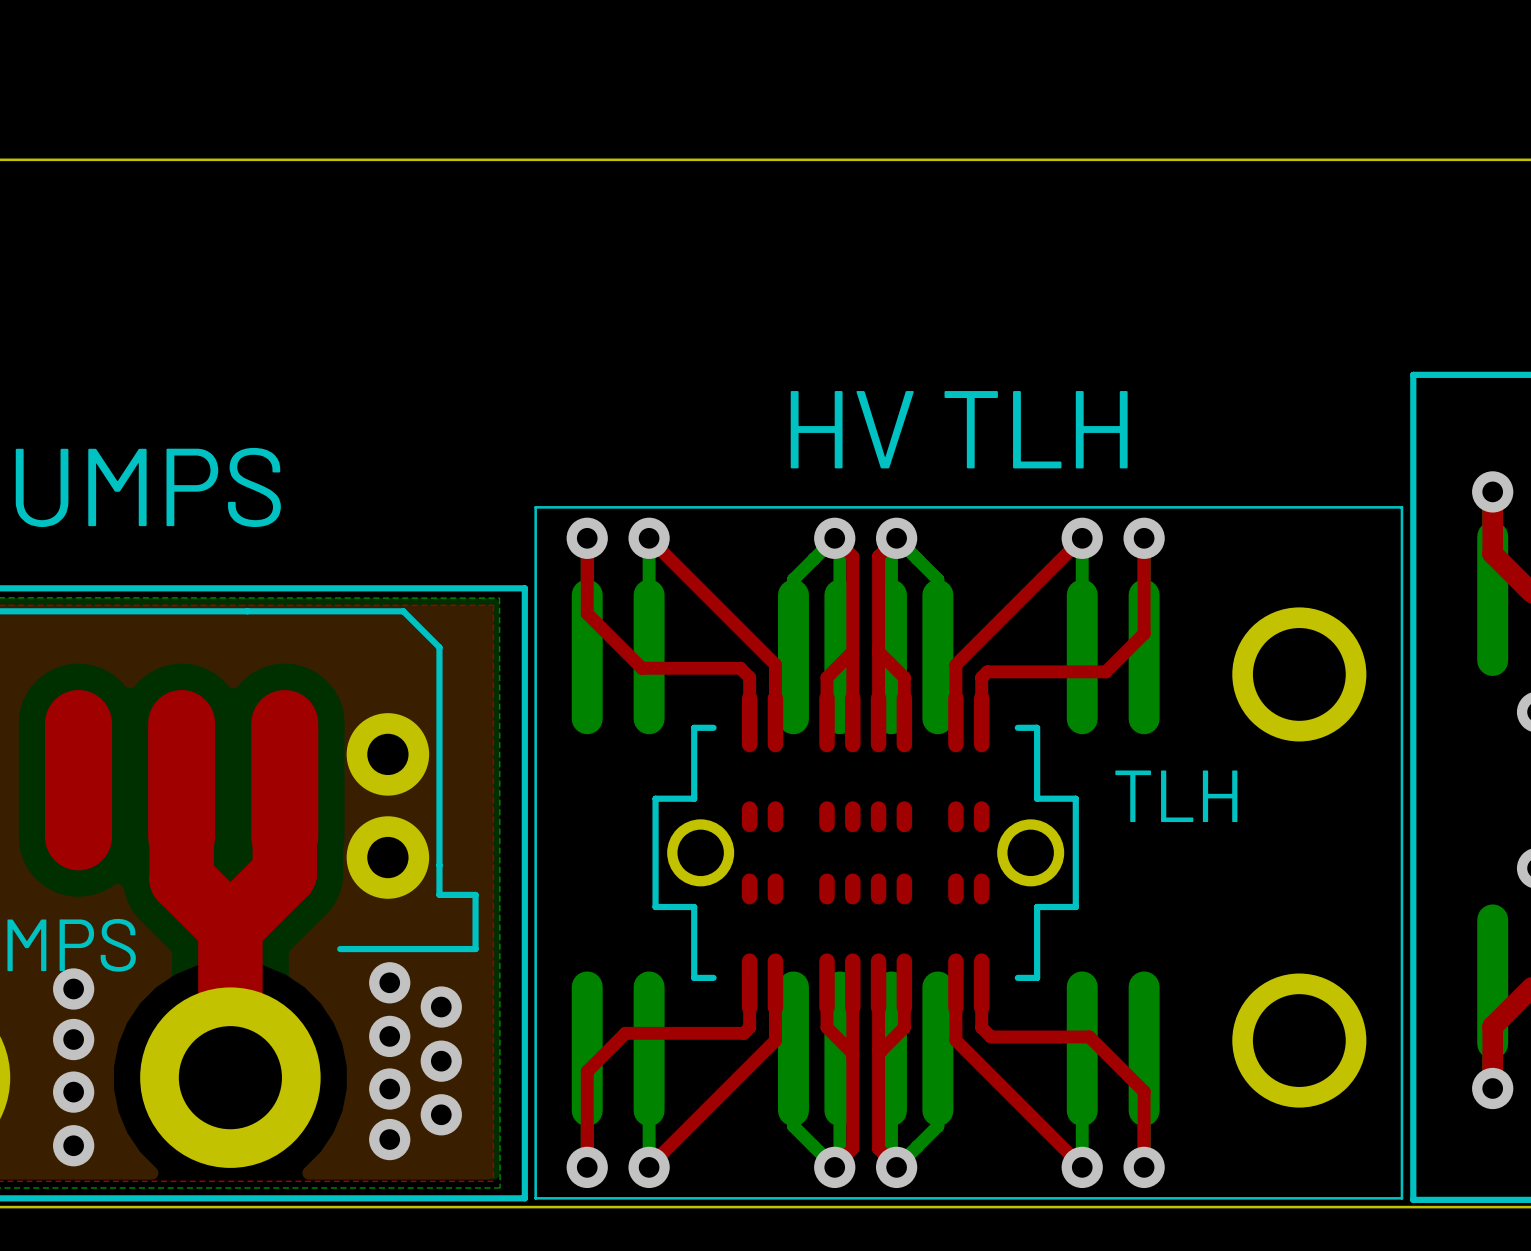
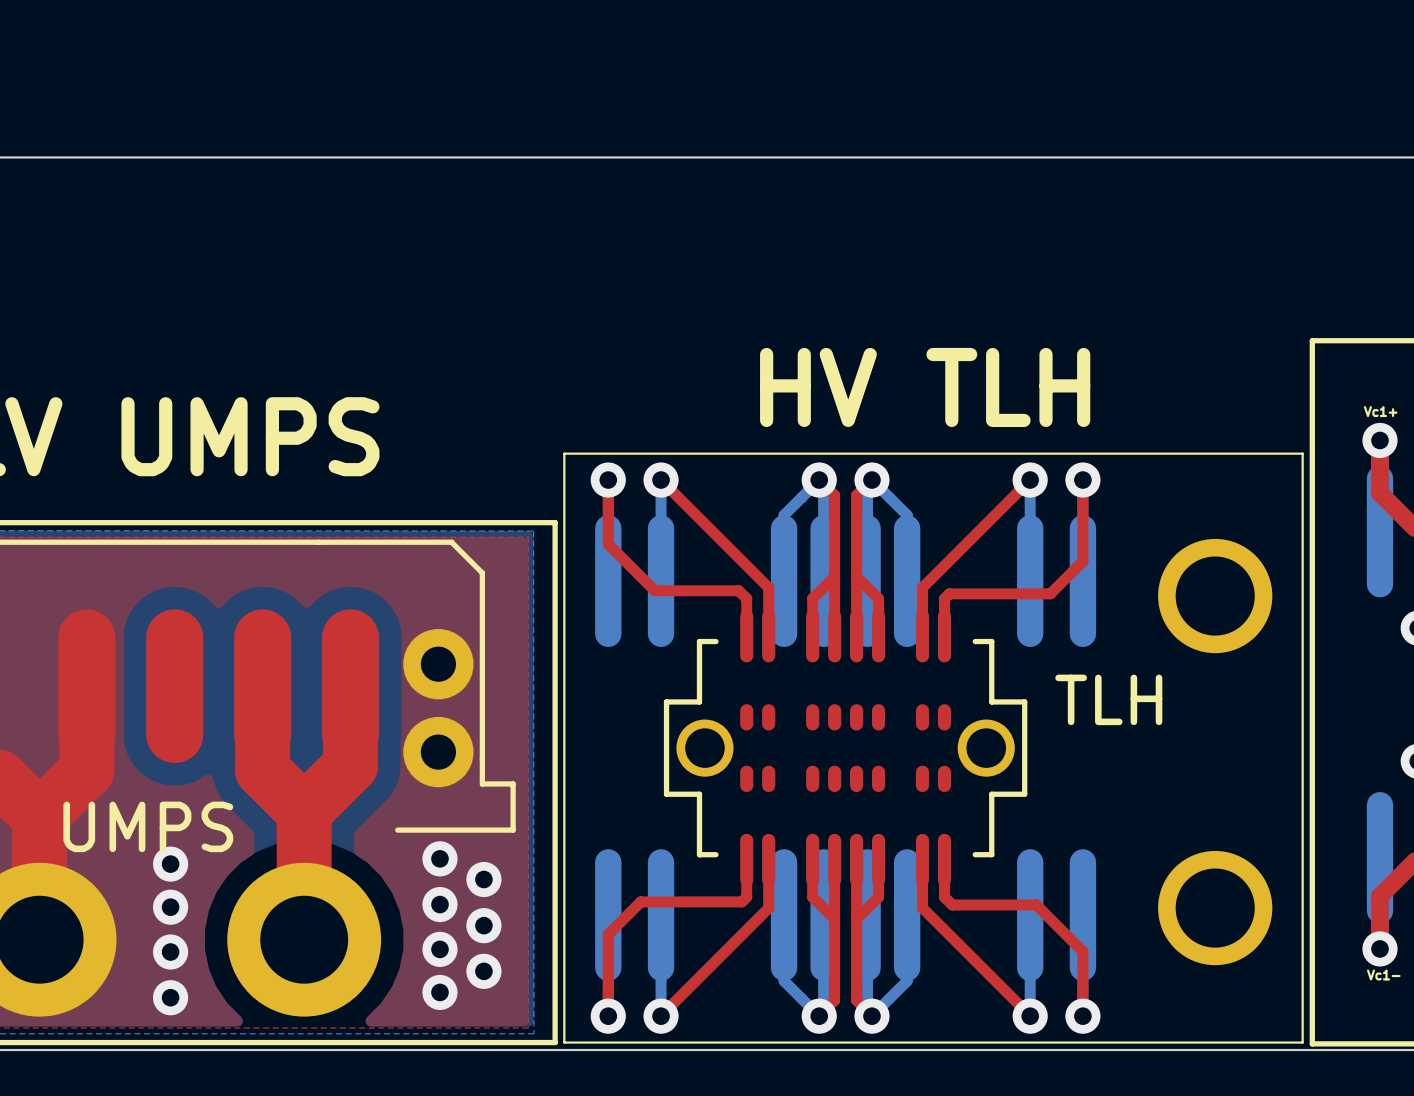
text: none -> Vc1+ (1380, 411)
text: none -> Vc1- (1383, 974)

